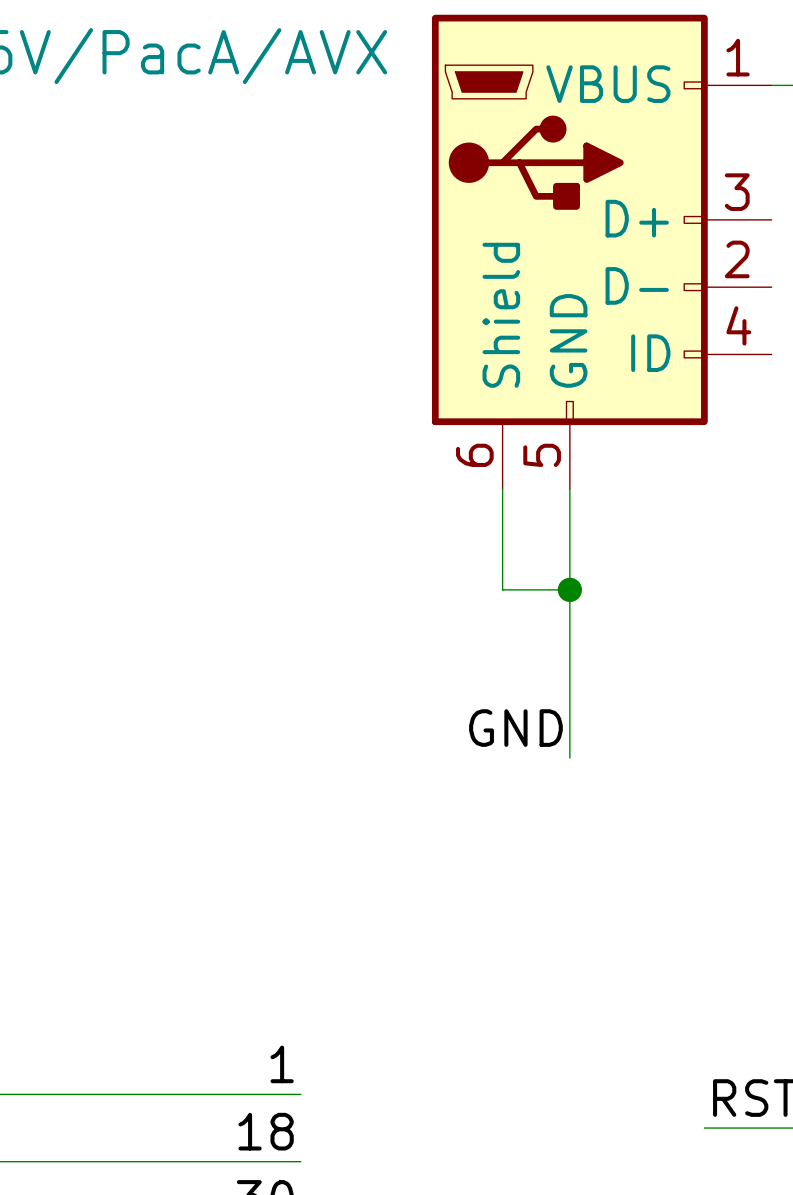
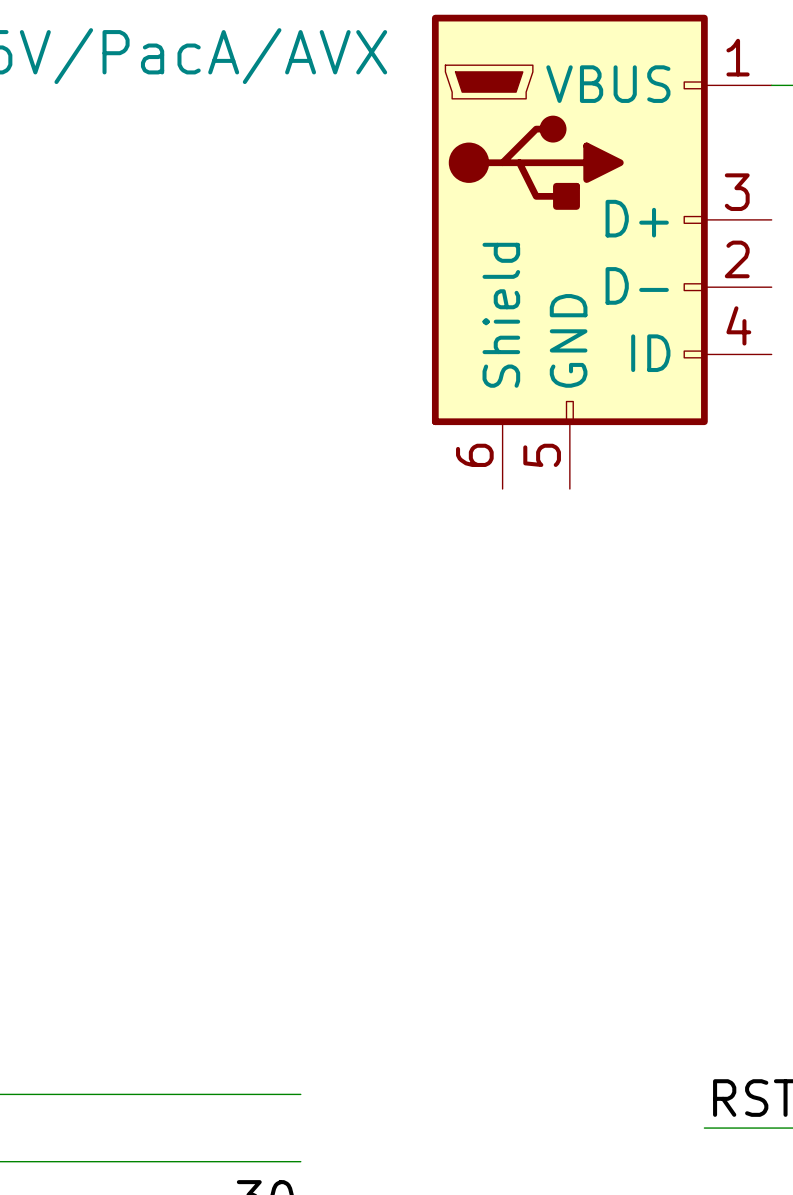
wire: (502, 488) (502, 589) (569, 589) -> none
wire: (569, 488) (569, 758) -> none
junction: (569, 589) -> none
label: GND (515, 728) -> none
label: 1 (282, 1064) -> none
label: 18 (266, 1131) -> none

